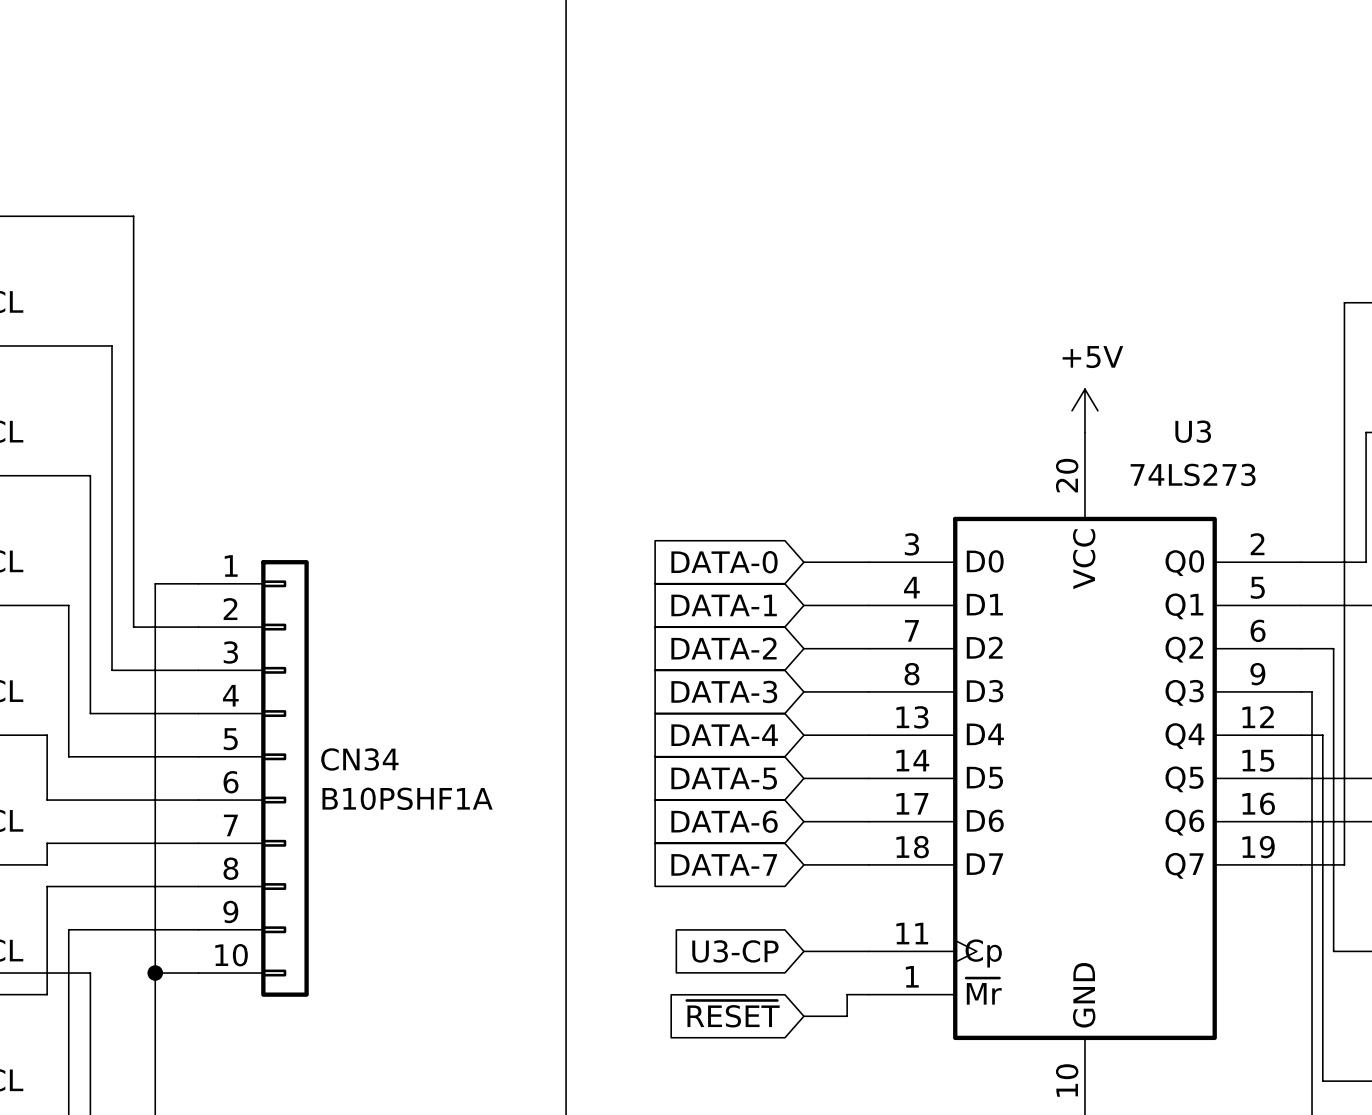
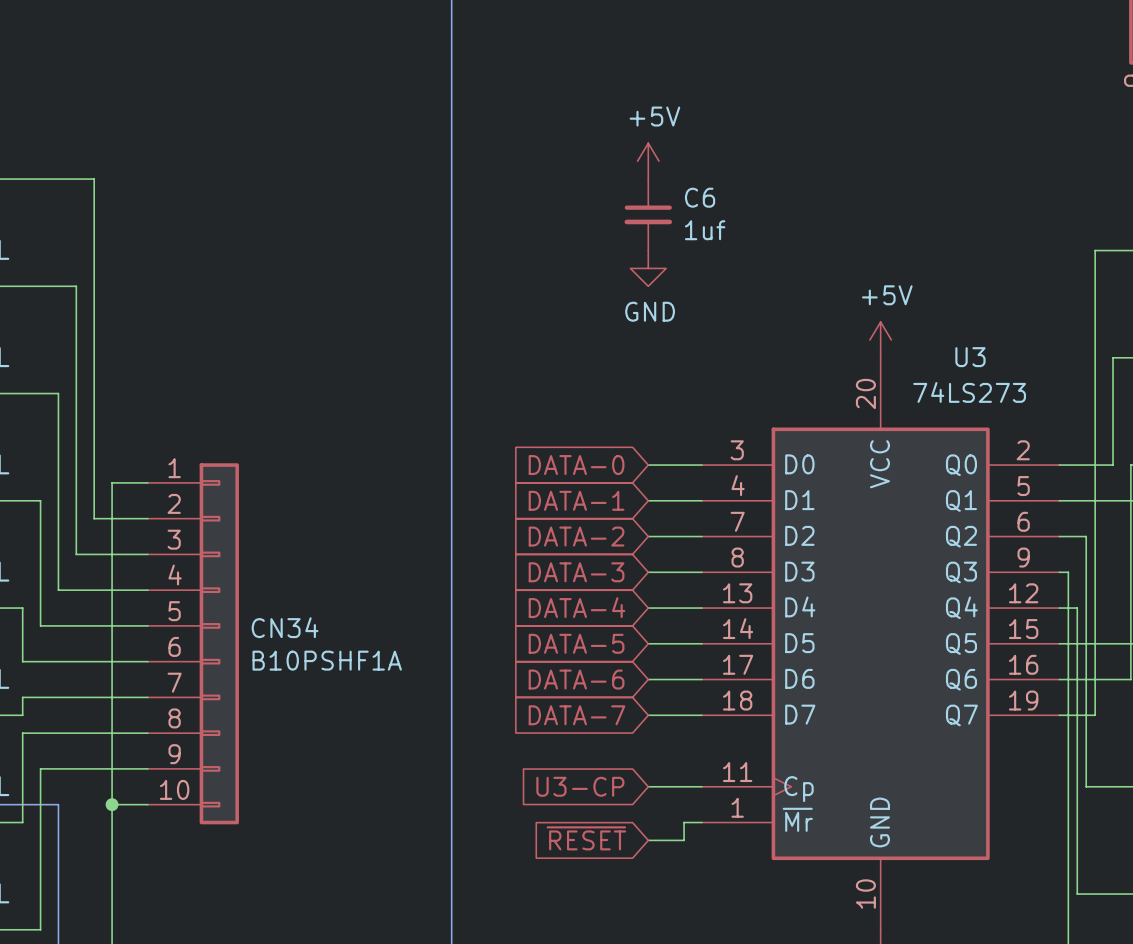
power symbol: none -> +5V (648, 161)
C6: none -> 1uf (648, 214)
power symbol: none -> GND (648, 268)

